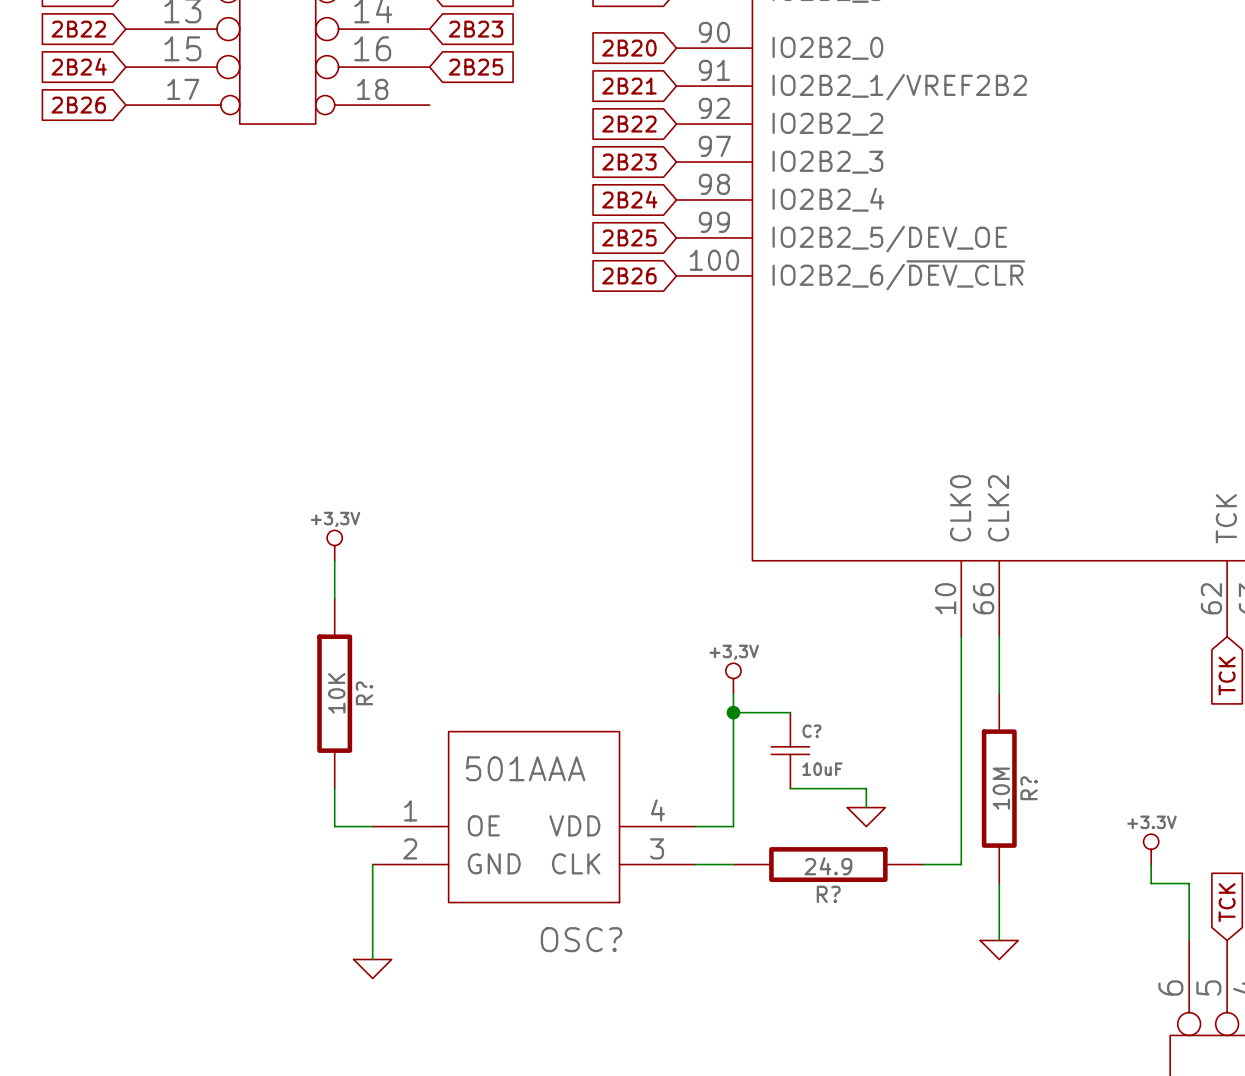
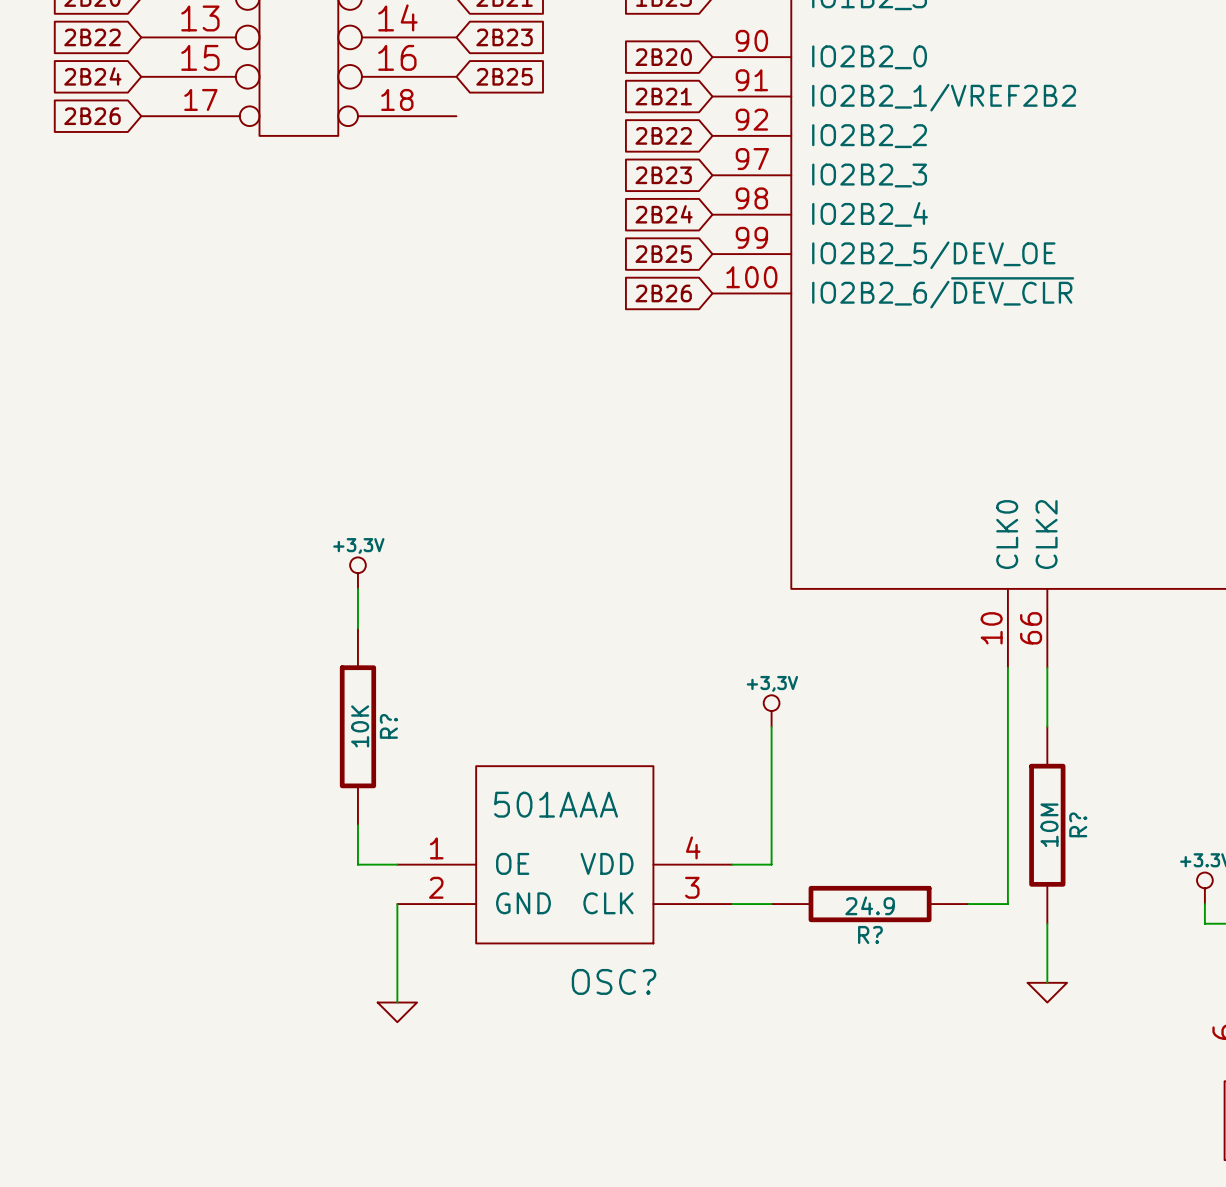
wire: (733, 712) (790, 712) -> none
junction: (733, 712) -> none
C?: 10uF (790, 750) -> none
wire: (790, 788) (866, 788) (866, 807) -> none
power symbol: (866, 817) -> none

